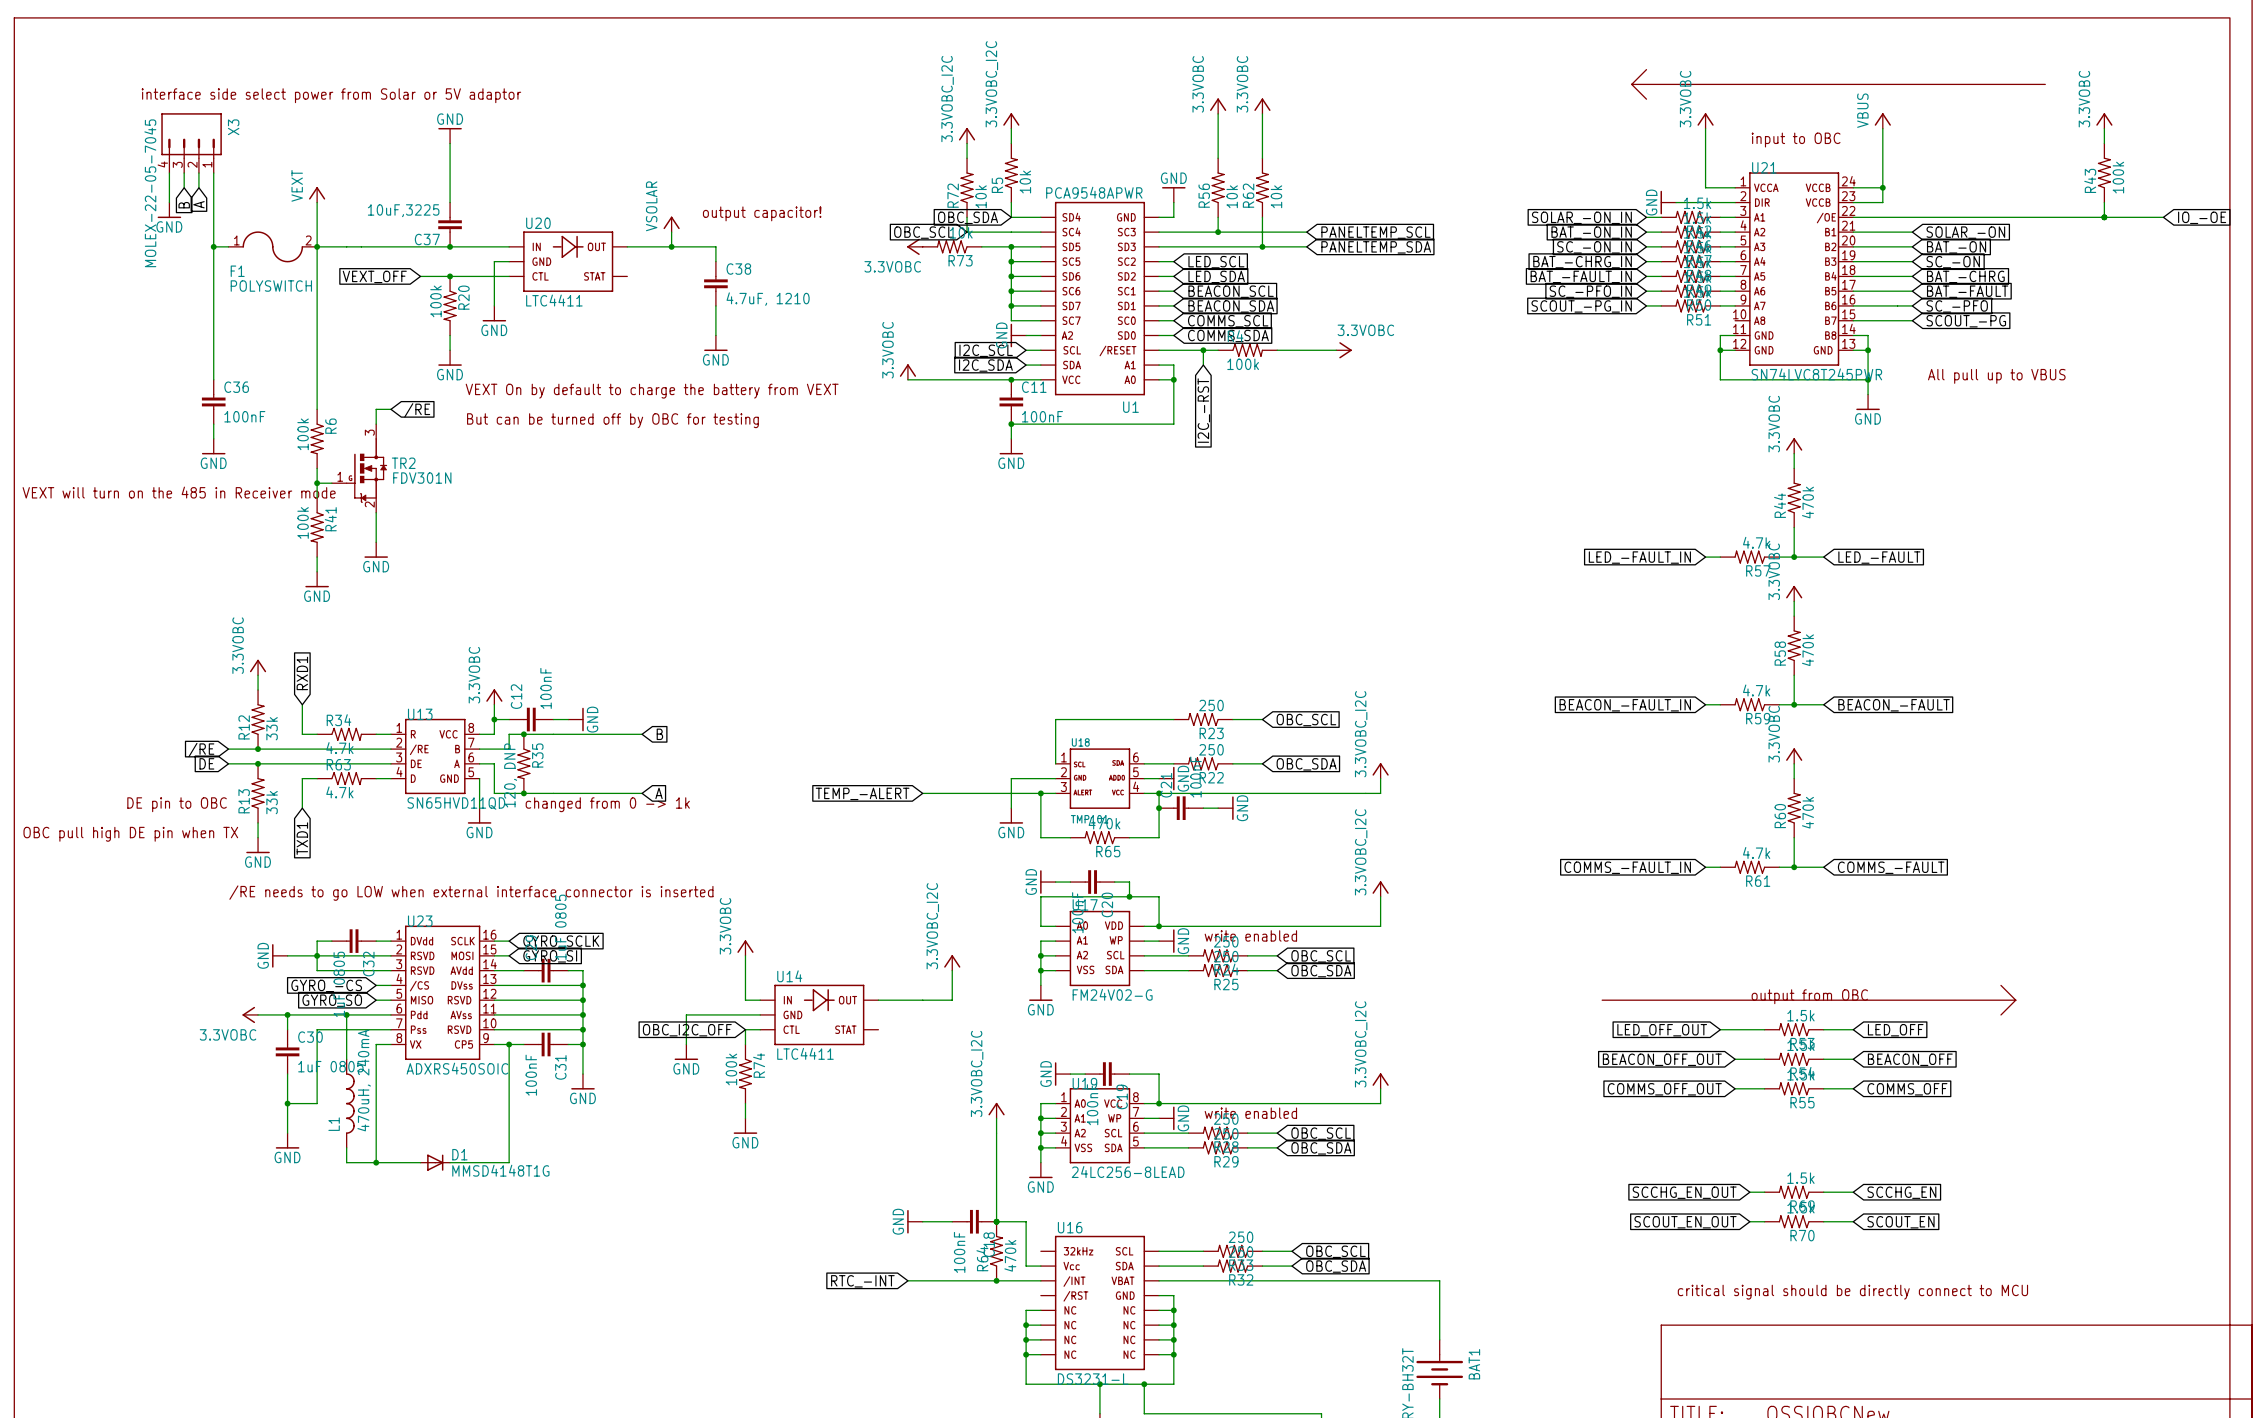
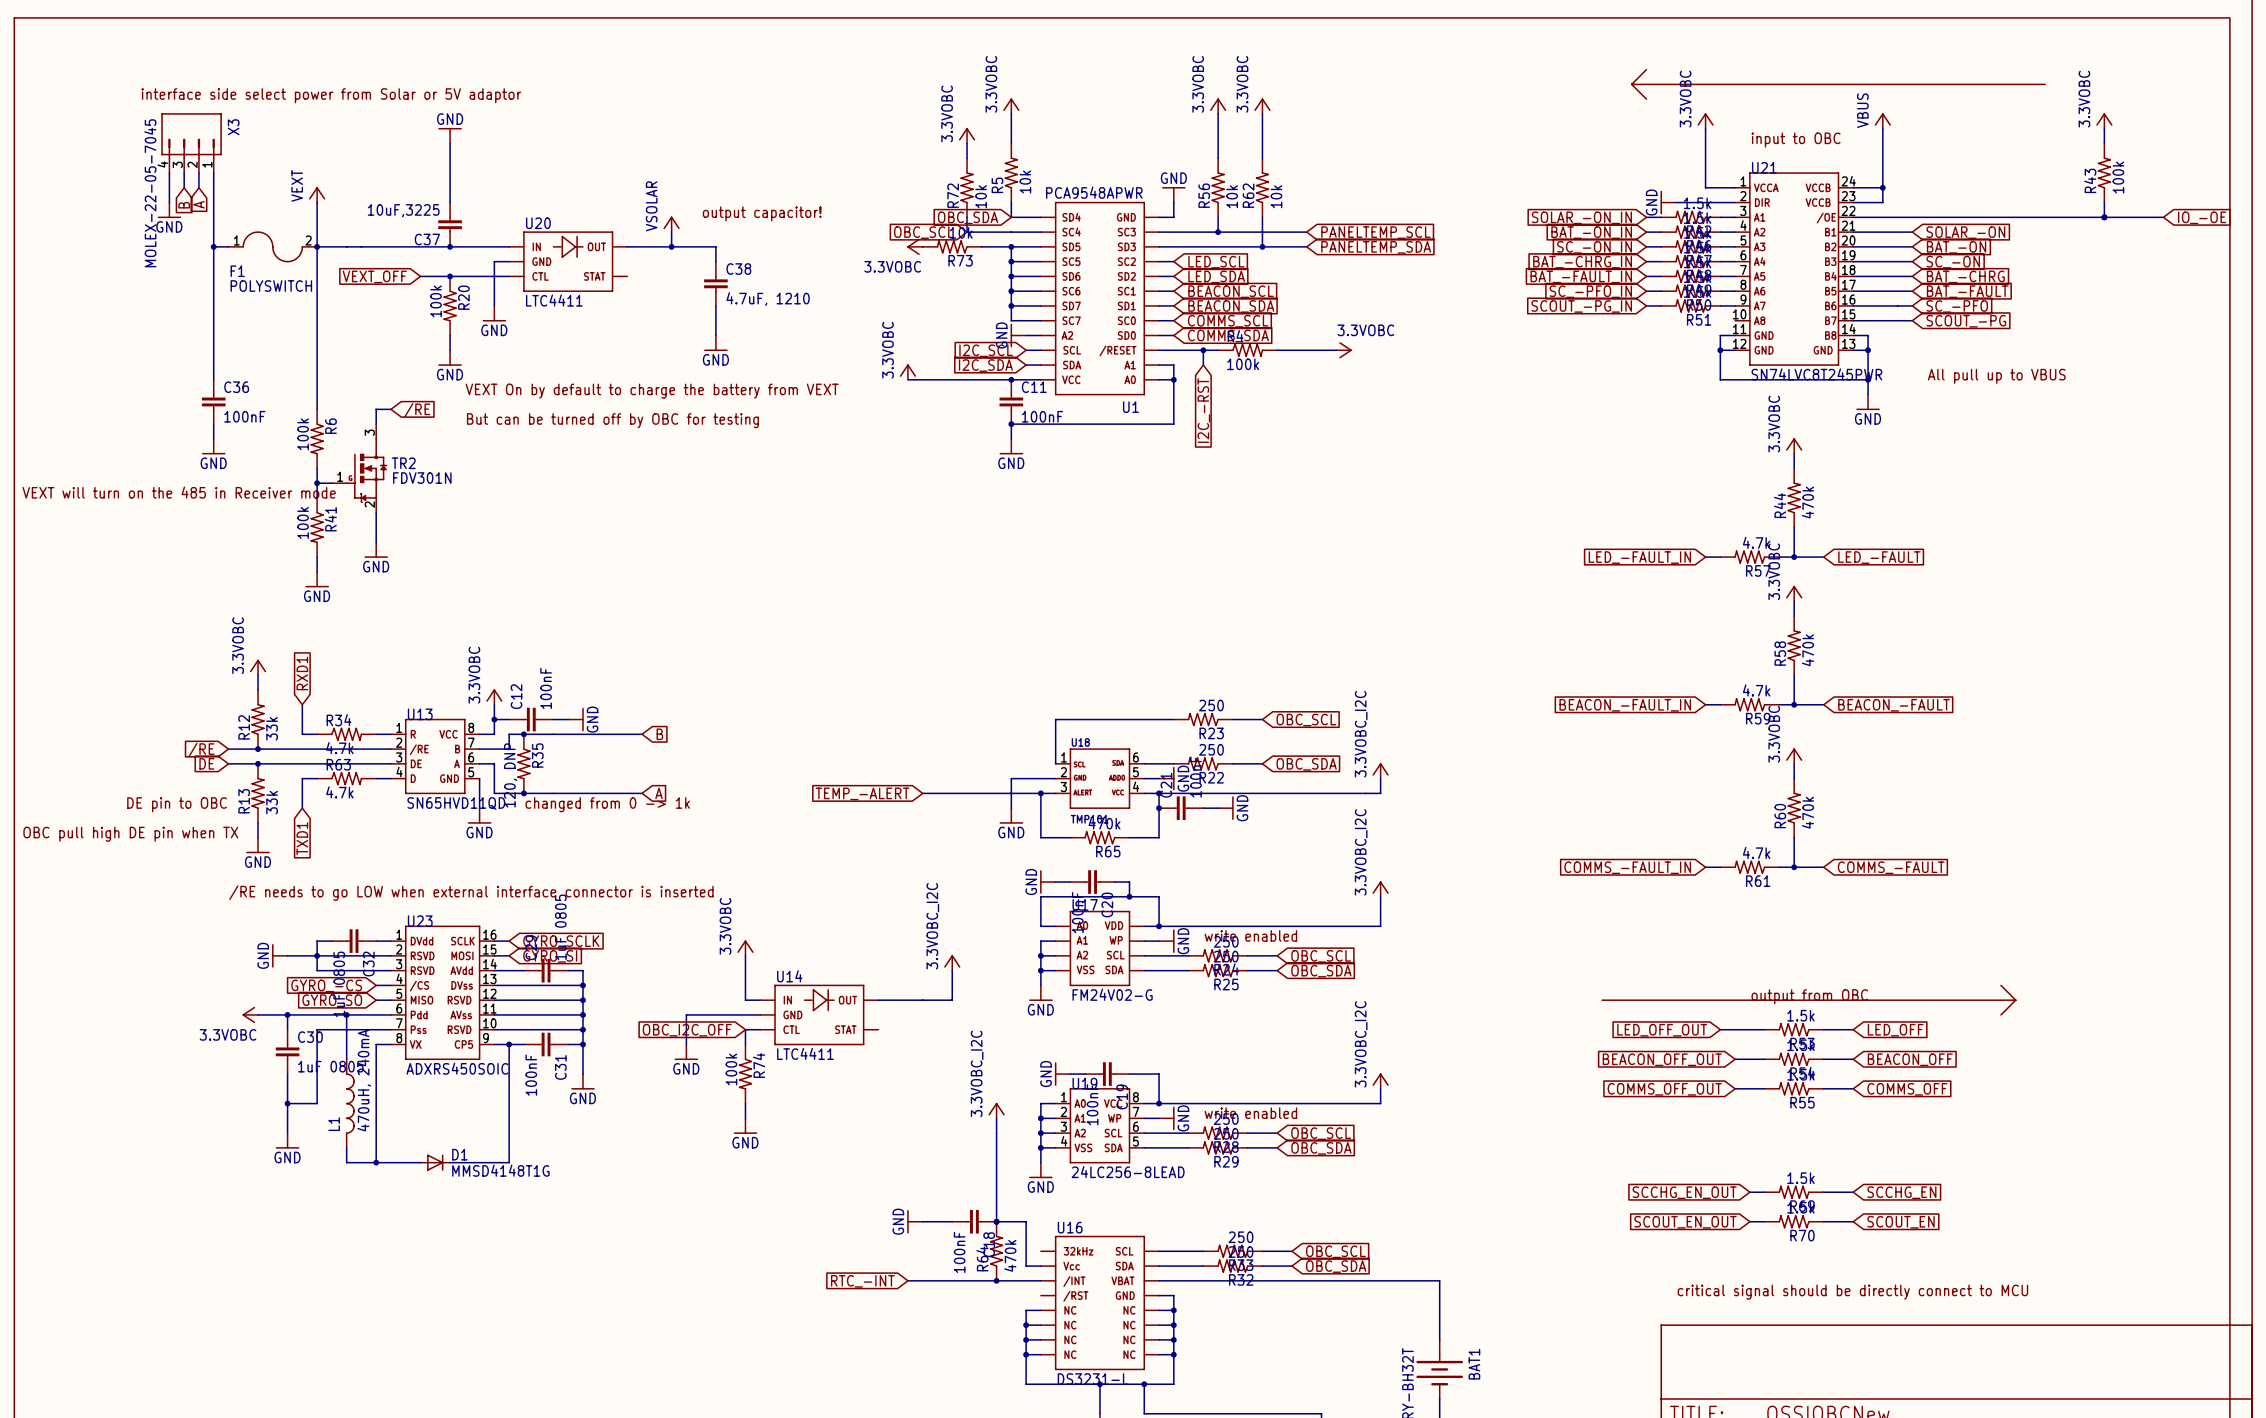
power symbol: none -> 3.3VOBC (1011, 106)
power symbol: 3.3VOBC_I2C (1011, 120) -> none
power symbol: 3.3VOBC_I2C (967, 135) -> 3.3VOBC (967, 135)

